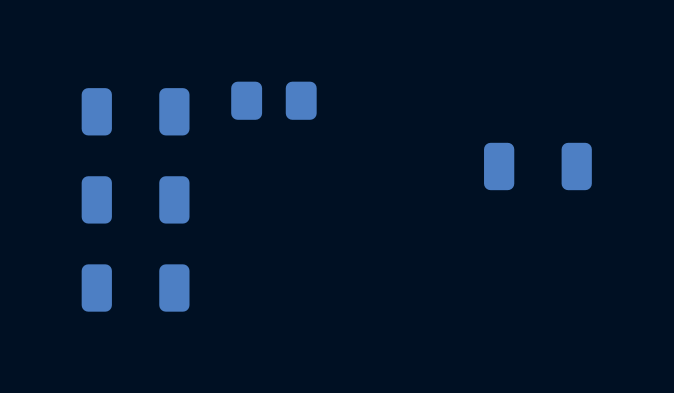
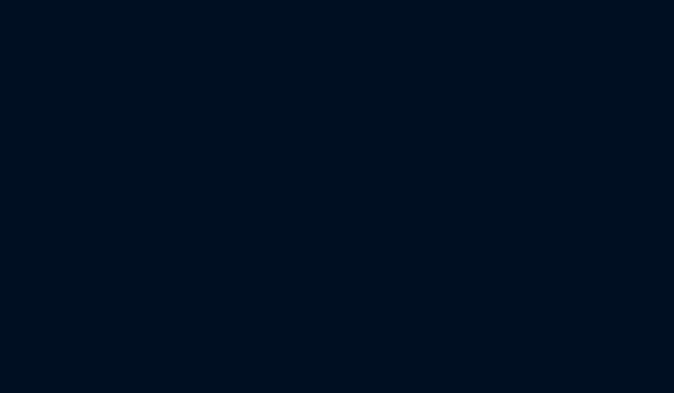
part: (273, 100) -> none
part: (135, 111) -> none
part: (537, 166) -> none
part: (135, 199) -> none
part: (135, 288) -> none

